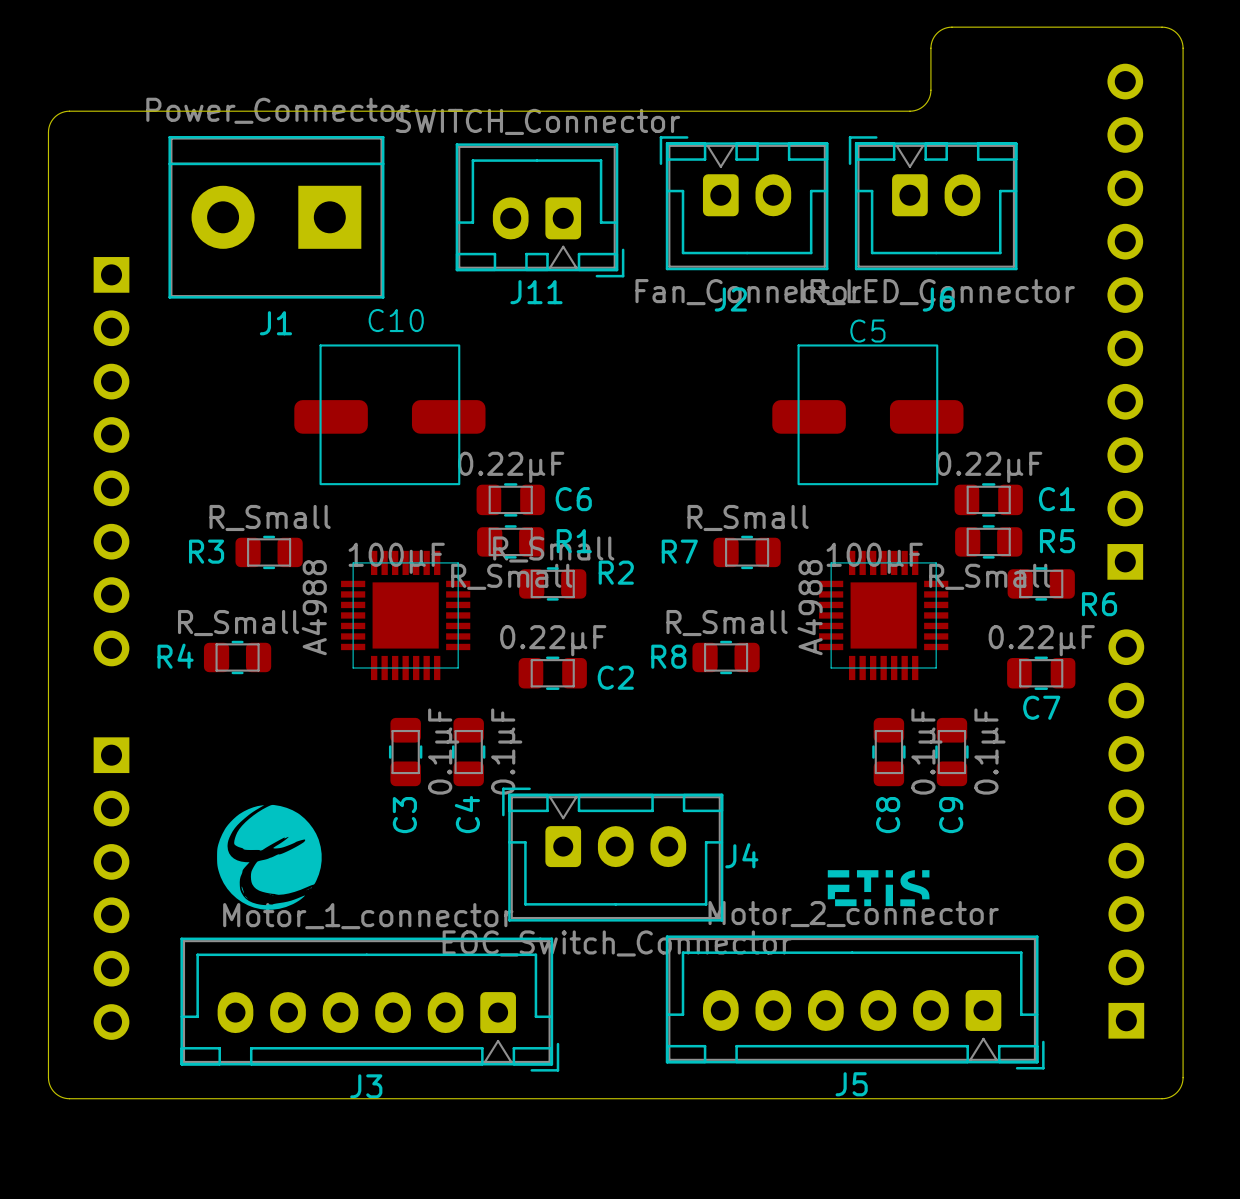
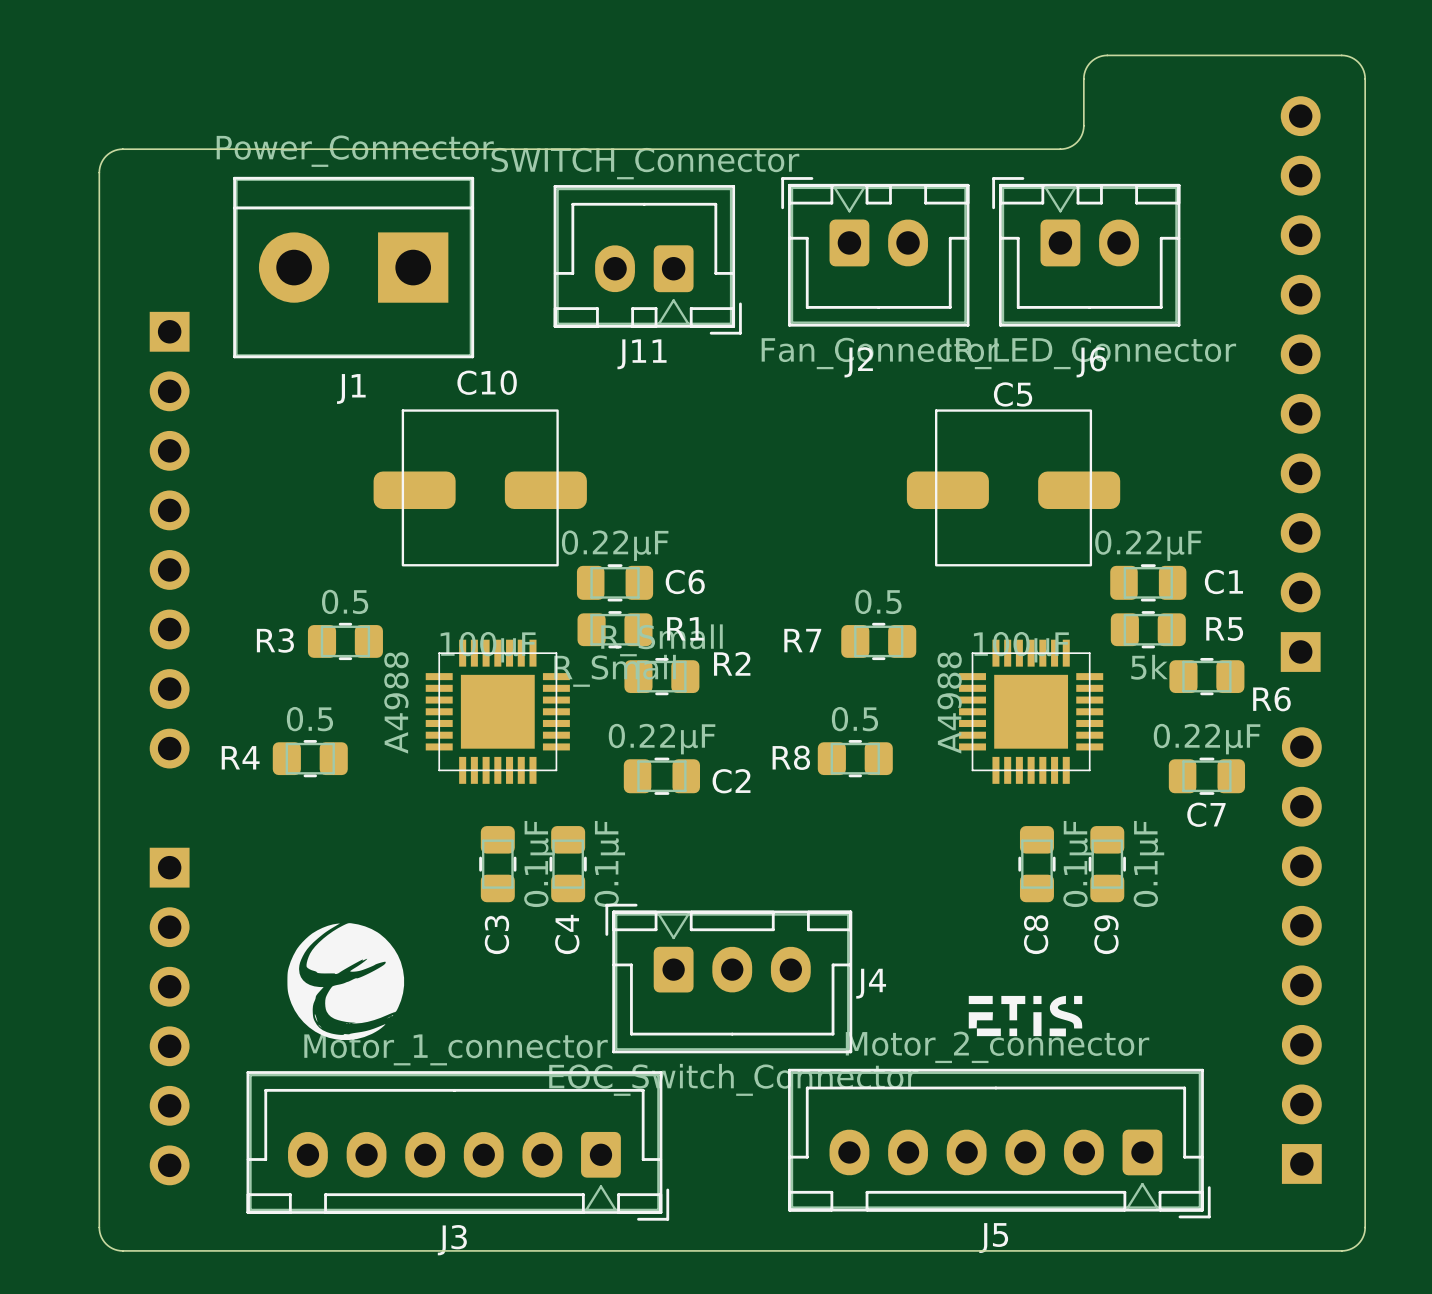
R3 value: R_Small (270, 517) -> 0.5 (345, 601)
R7 value: R_Small (748, 517) -> 0.5 (878, 601)
R5 value: R_Small (989, 576) -> 5k (1149, 667)
R4 value: R_Small (238, 623) -> 0.5 (309, 719)
R8 value: R_Small (727, 623) -> 0.5 (854, 719)

